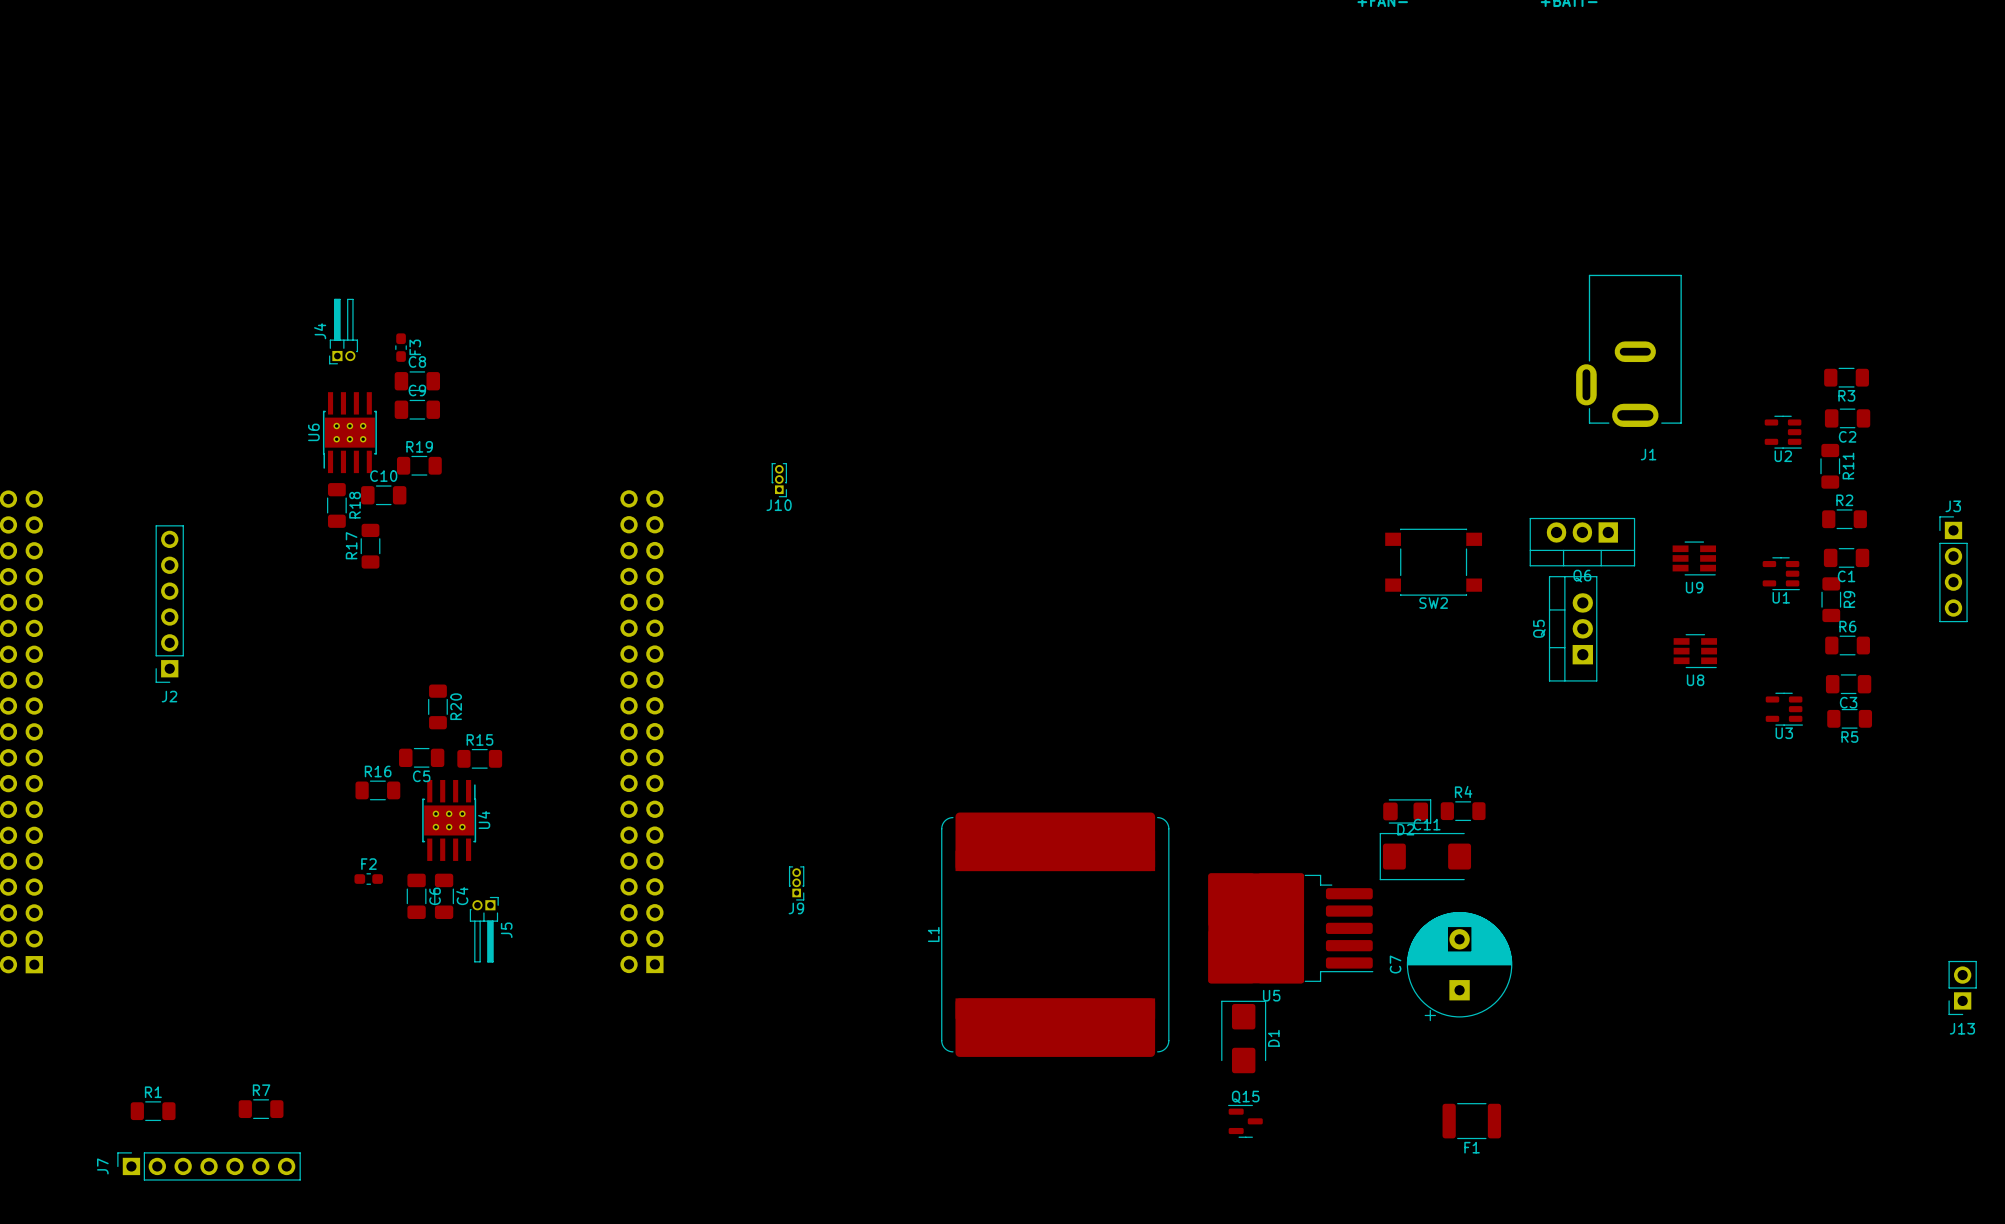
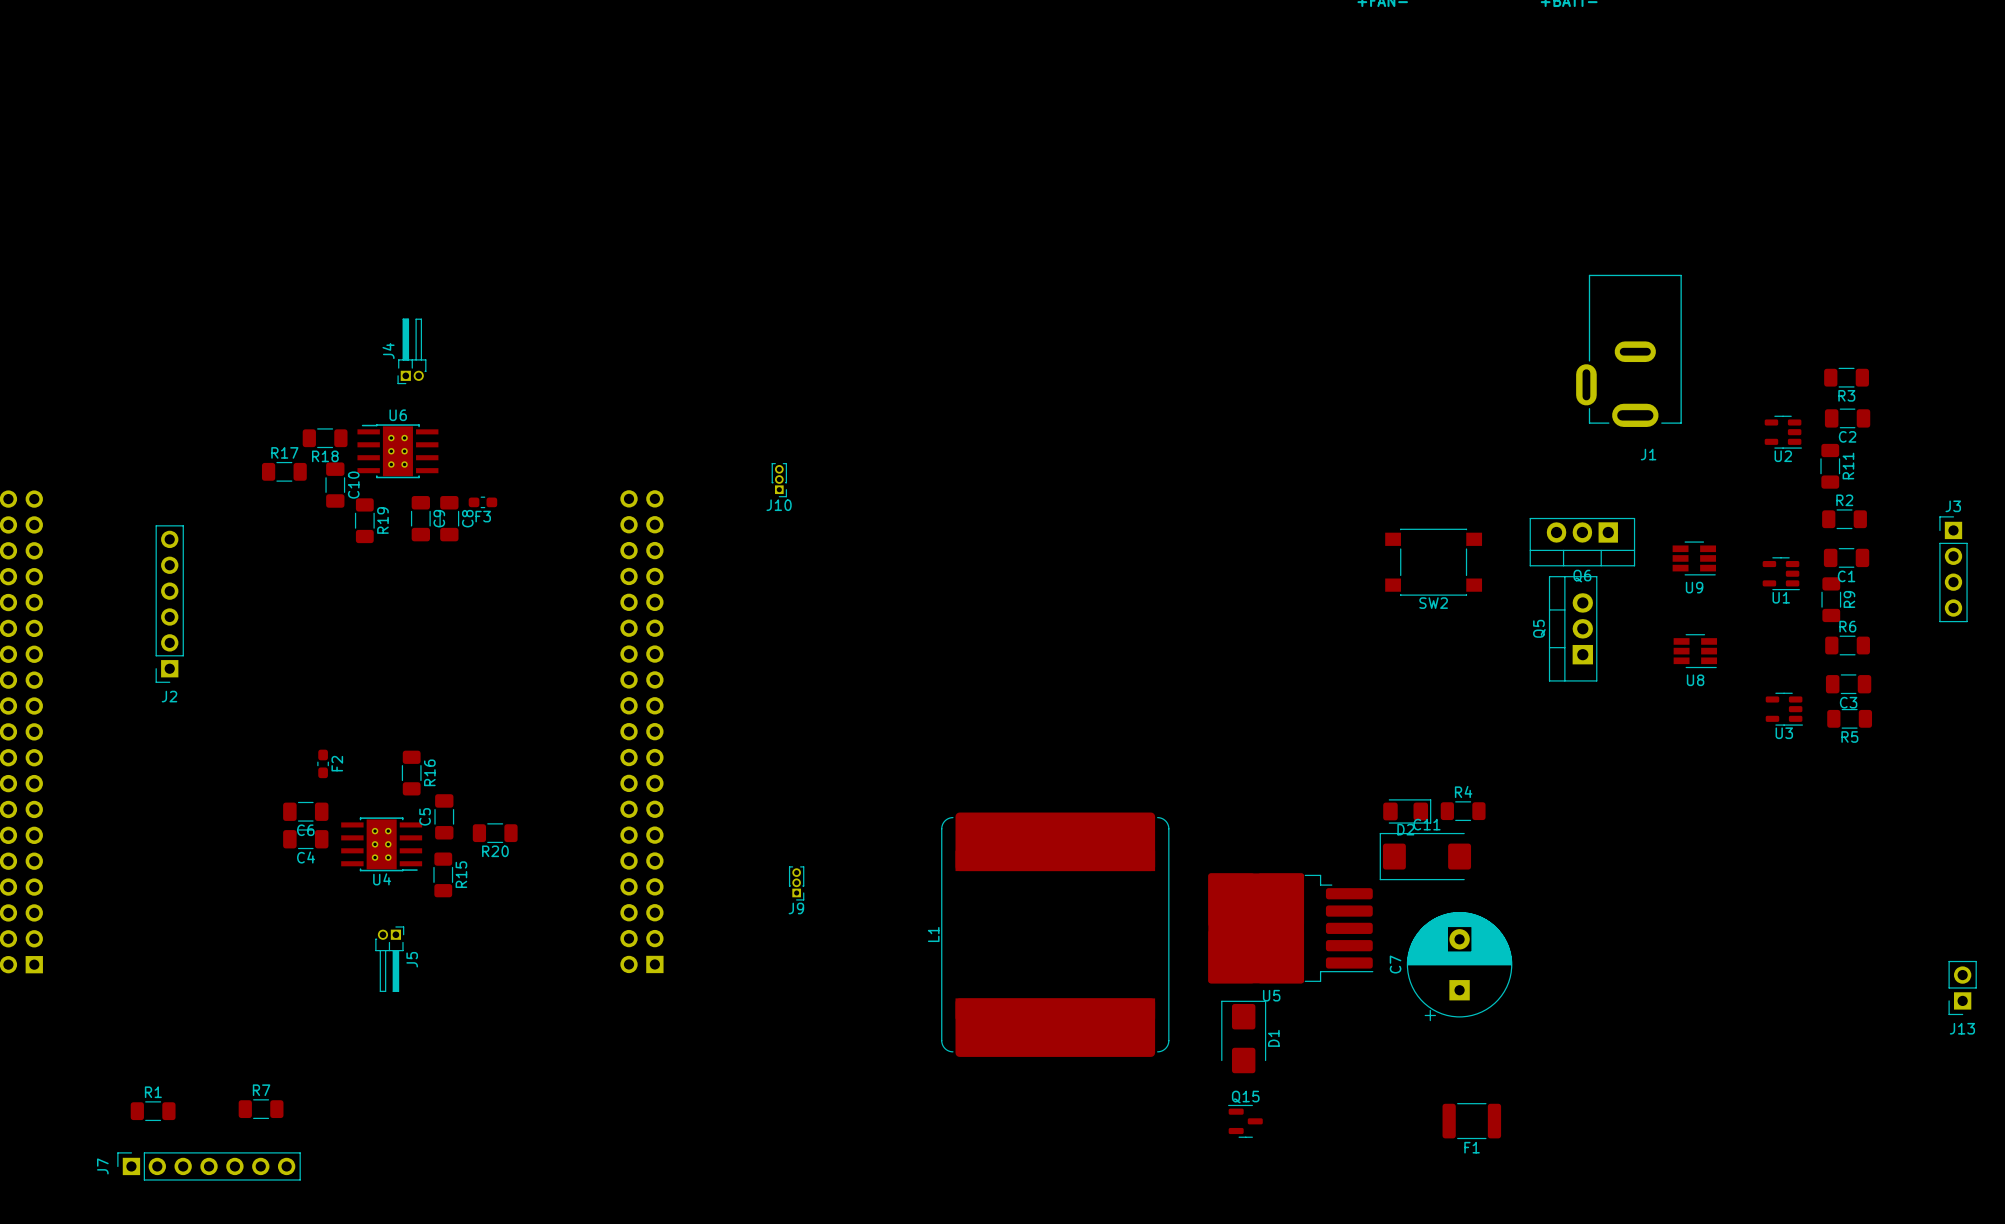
J4 position: (343, 331) -> (411, 351)
F3 rotation: 0° (401, 347) -> 90° clockwise (482, 502)
F3 position: (401, 347) -> (482, 502)
C8 rotation: 0° (417, 381) -> 90° clockwise (449, 518)
C8 position: (417, 381) -> (449, 518)
C9 rotation: 0° (417, 409) -> 90° clockwise (420, 518)
C9 position: (417, 409) -> (420, 518)
U6 rotation: 0° (349, 432) -> 90° clockwise (397, 451)
U6 position: (349, 432) -> (397, 451)
R19 rotation: 0° (419, 465) -> 90° clockwise (364, 520)
R19 position: (419, 465) -> (364, 520)
C10 rotation: 0° (383, 495) -> 90° clockwise (335, 485)
C10 position: (383, 495) -> (335, 485)
R18 rotation: 0° (336, 505) -> 90° clockwise (325, 438)
R18 position: (336, 505) -> (325, 438)
R17 rotation: 0° (370, 546) -> 90° clockwise (284, 471)
R17 position: (370, 546) -> (284, 471)
R20 rotation: 0° (437, 706) -> 90° clockwise (495, 833)
R20 position: (437, 706) -> (495, 833)
C5 rotation: 0° (421, 757) -> 90° clockwise (444, 816)
C5 position: (421, 757) -> (444, 816)
R15 rotation: 0° (479, 758) -> 90° clockwise (443, 874)
R15 position: (479, 758) -> (443, 874)
R16 rotation: 0° (377, 790) -> 90° clockwise (411, 773)
R16 position: (377, 790) -> (411, 773)
U4 rotation: 0° (449, 820) -> 90° clockwise (381, 844)
U4 position: (449, 820) -> (381, 844)
F2 rotation: 0° (368, 879) -> 90° clockwise (323, 763)
F2 position: (368, 879) -> (323, 763)
C6 rotation: 0° (416, 896) -> 90° clockwise (305, 811)
C6 position: (416, 896) -> (305, 811)
C4 rotation: 0° (444, 896) -> 90° clockwise (305, 839)
C4 position: (444, 896) -> (305, 839)
J5 position: (484, 929) -> (389, 959)

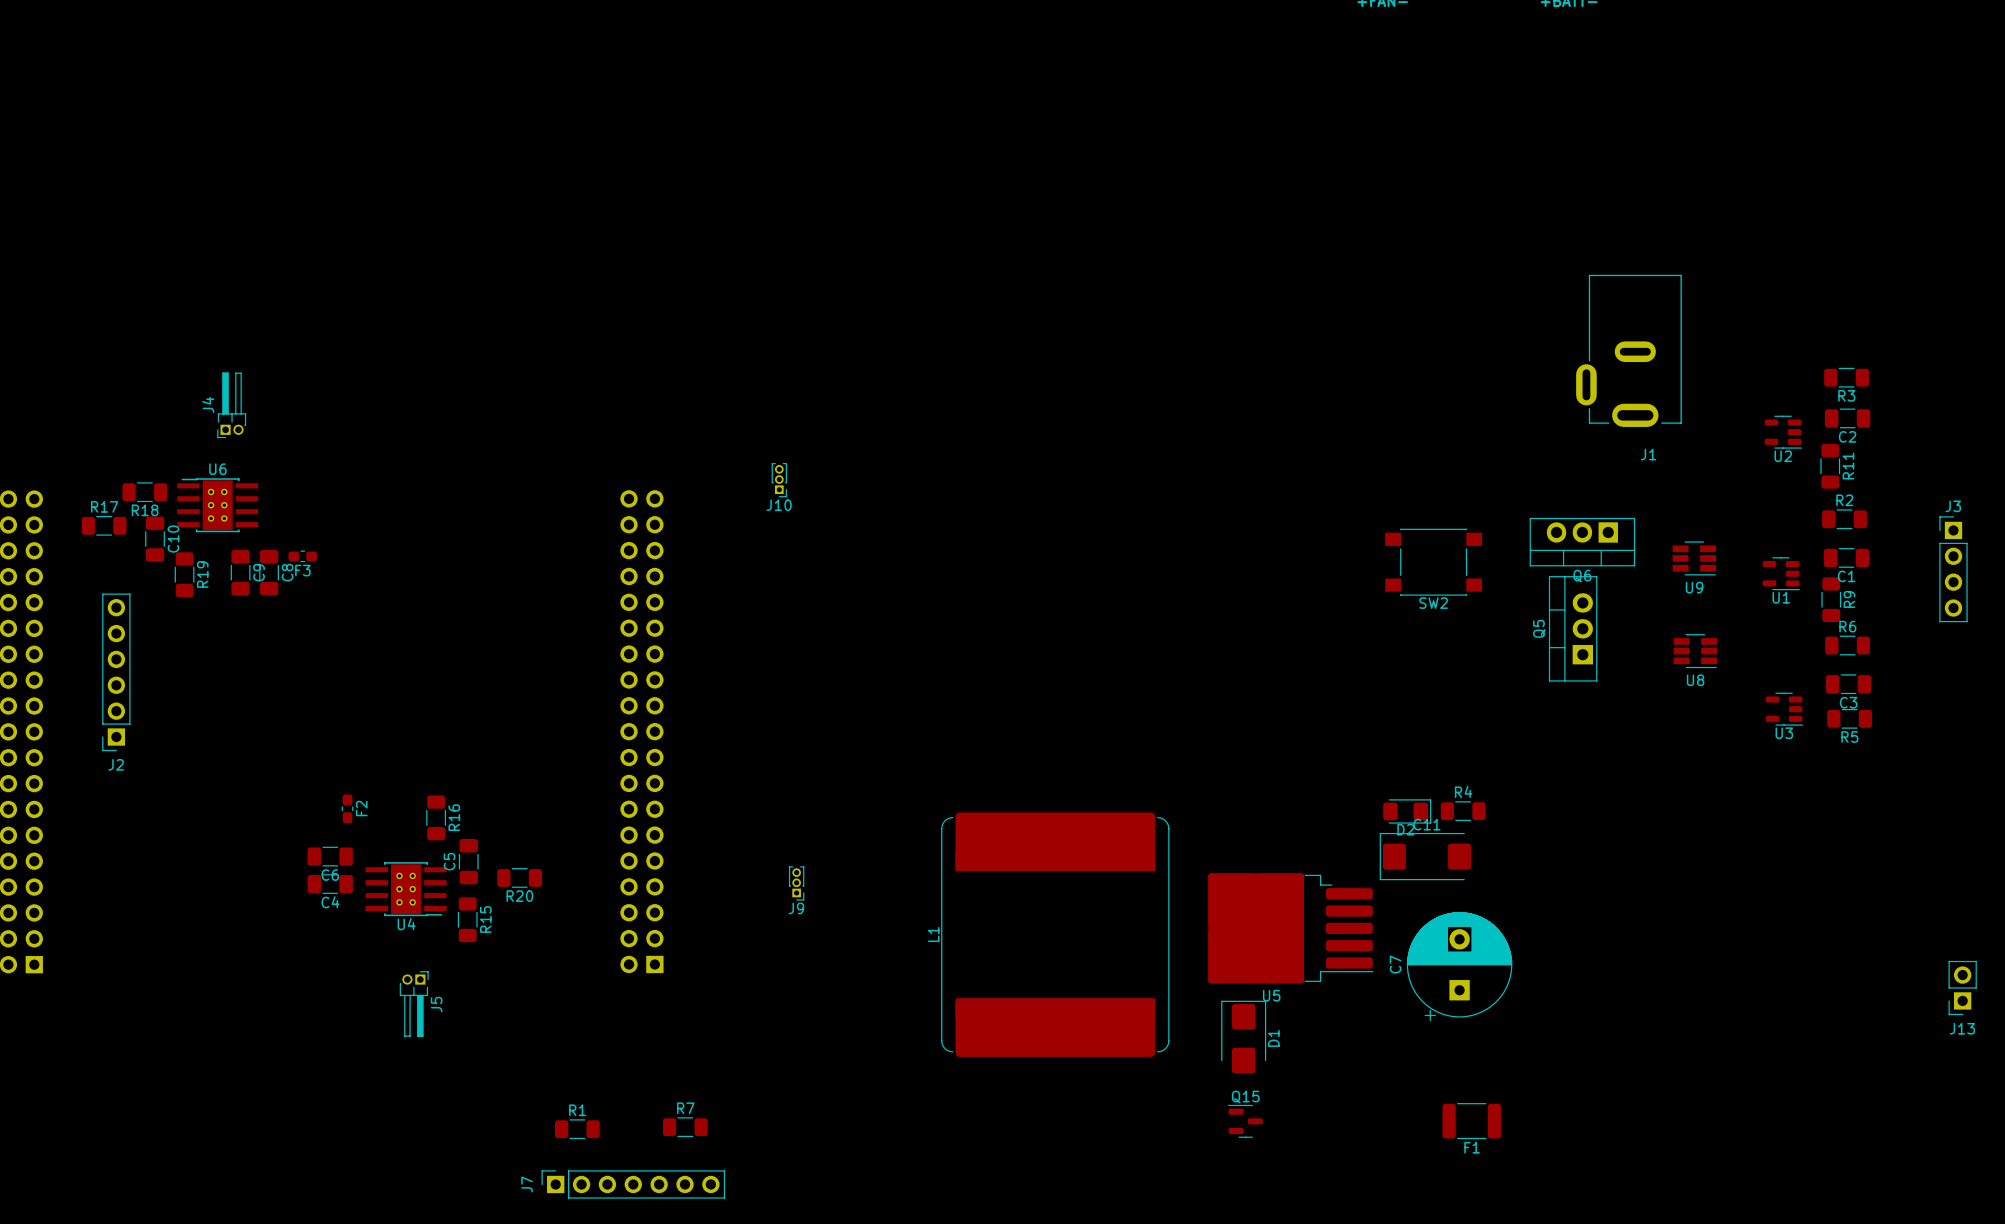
J4 position: (411, 351) -> (231, 405)
R18 position: (325, 438) -> (144, 492)
U6 position: (397, 451) -> (217, 505)
R17 position: (284, 471) -> (104, 525)
C10 position: (335, 485) -> (155, 539)
F3 position: (482, 502) -> (302, 556)
C9 position: (420, 518) -> (240, 572)
C8 position: (449, 518) -> (269, 572)
R19 position: (364, 520) -> (184, 574)
J2 position: (169, 604) -> (116, 672)
F2 position: (323, 763) -> (347, 808)
R16 position: (411, 773) -> (436, 817)
C6 position: (305, 811) -> (330, 856)
C5 position: (444, 816) -> (468, 861)
R20 position: (495, 833) -> (519, 877)
C4 position: (305, 839) -> (330, 884)
U4 position: (381, 844) -> (406, 889)
R15 position: (443, 874) -> (467, 919)
J5 position: (389, 959) -> (414, 1003)
R7 position: (261, 1109) -> (685, 1127)
R1 position: (153, 1111) -> (577, 1129)
J7 position: (209, 1166) -> (633, 1184)

